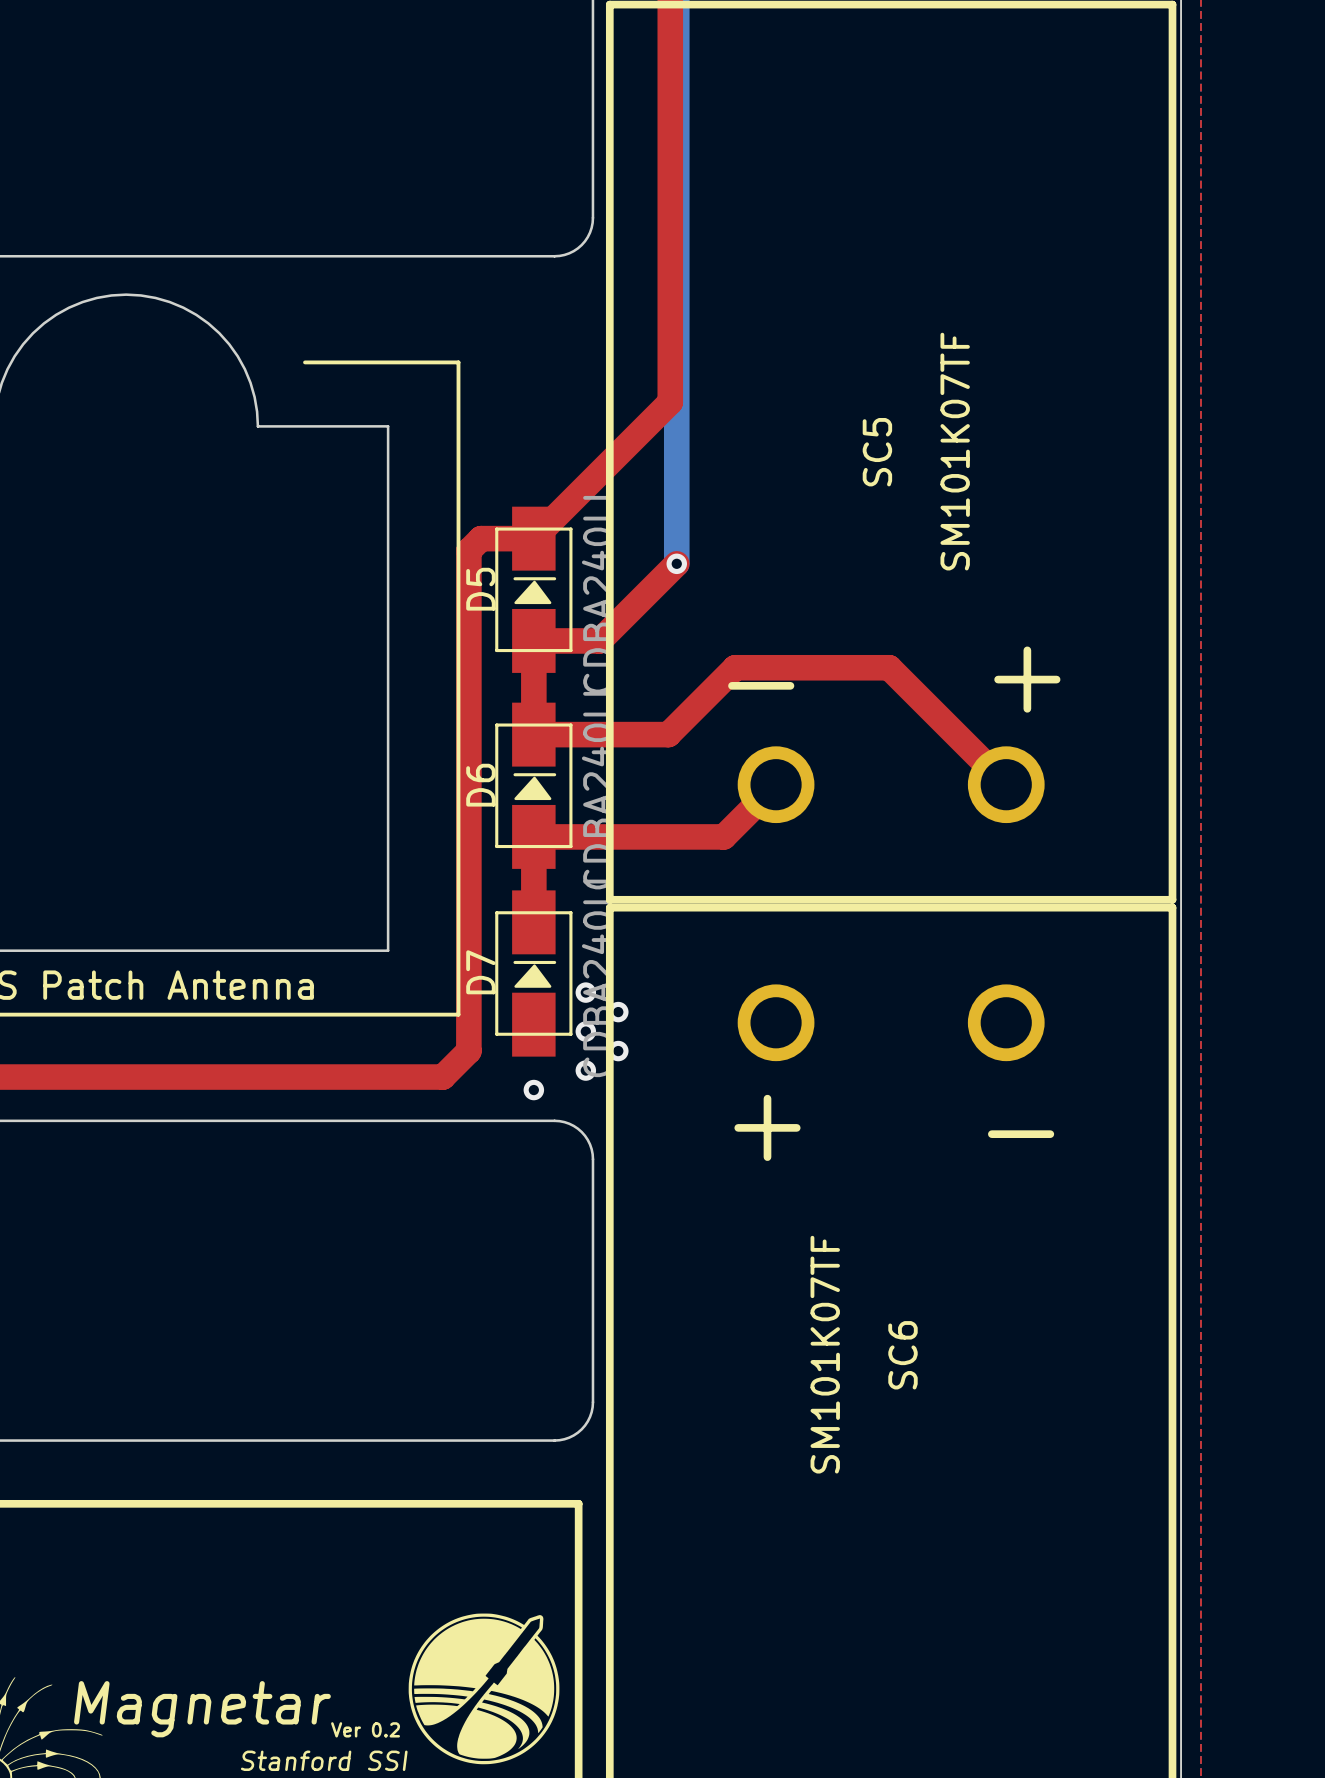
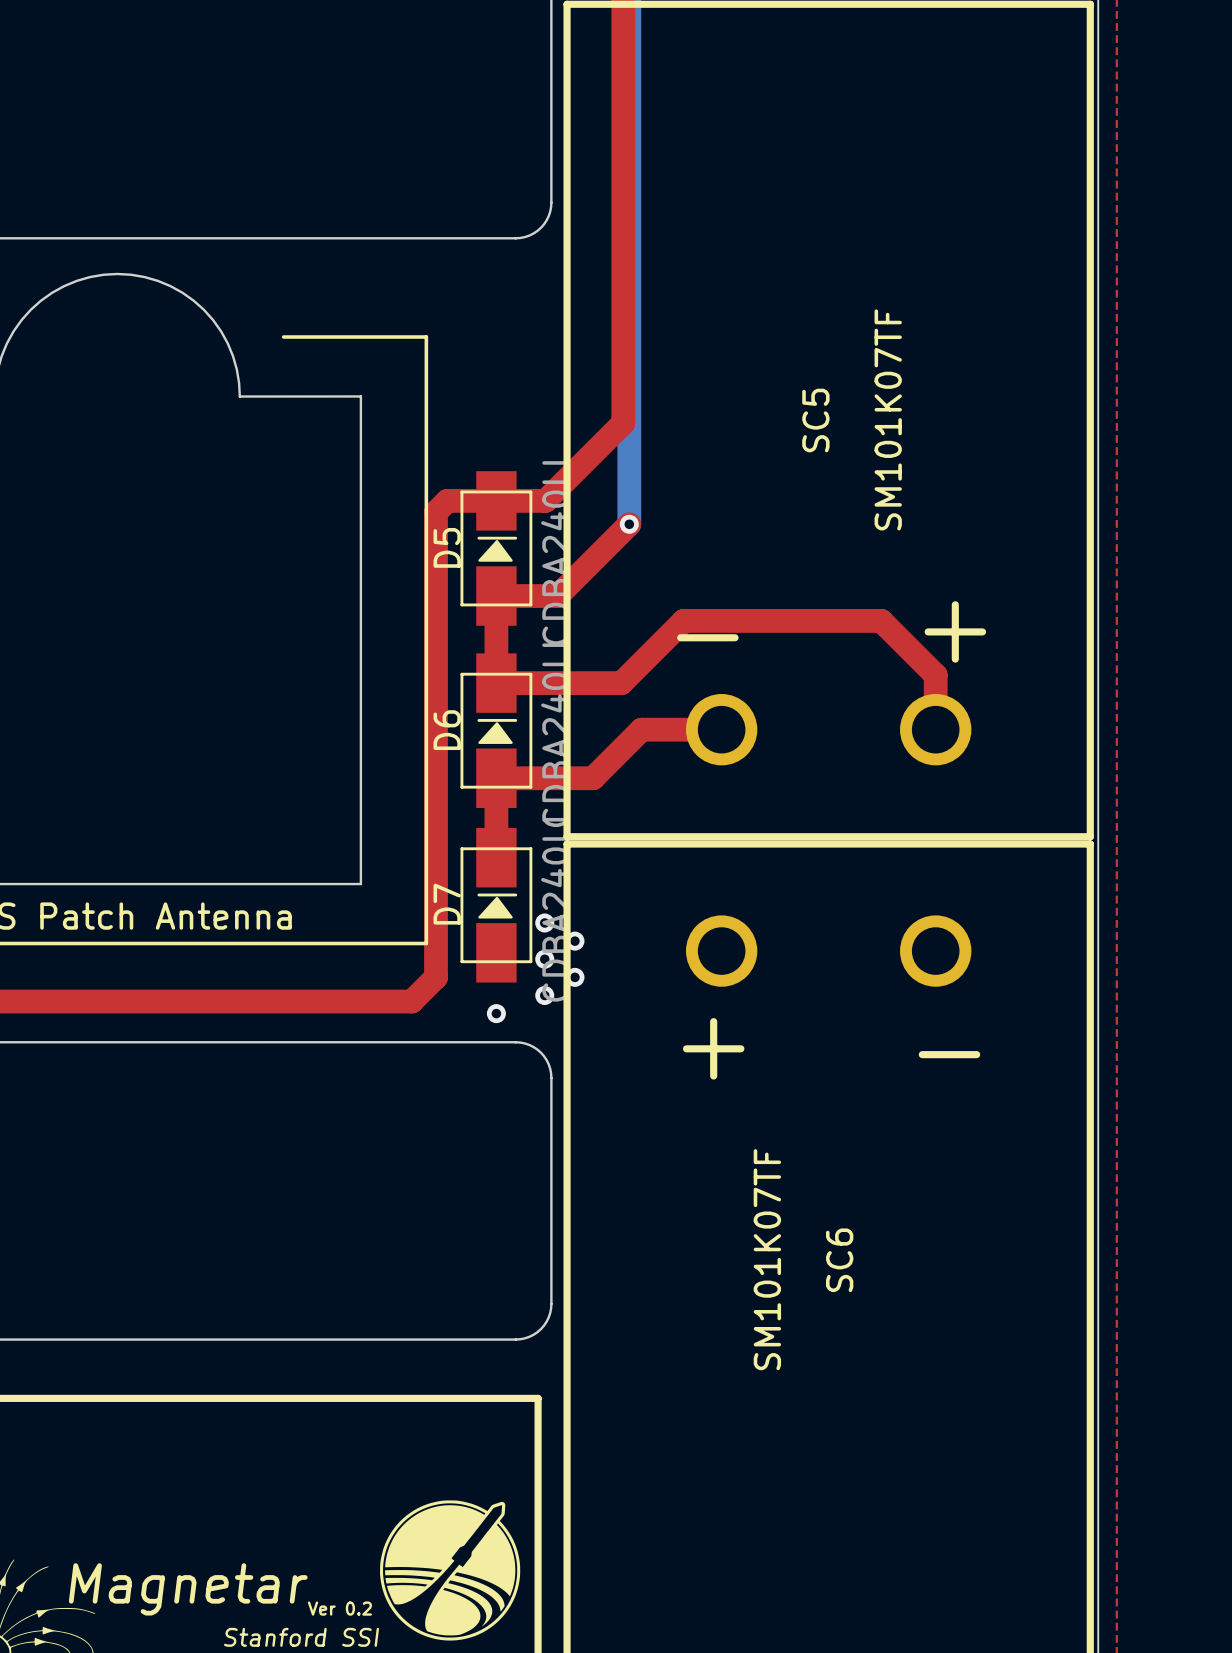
top track: (670, 402) (533, 538) -> (623, 374) (623, 423) (545, 500) (496, 500)
top track: (889, 667) (1006, 784) -> (826, 620) (881, 620) (935, 675) (935, 729)
top track: (776, 784) (723, 836) (637, 836) -> (721, 729) (641, 729) (593, 778)

